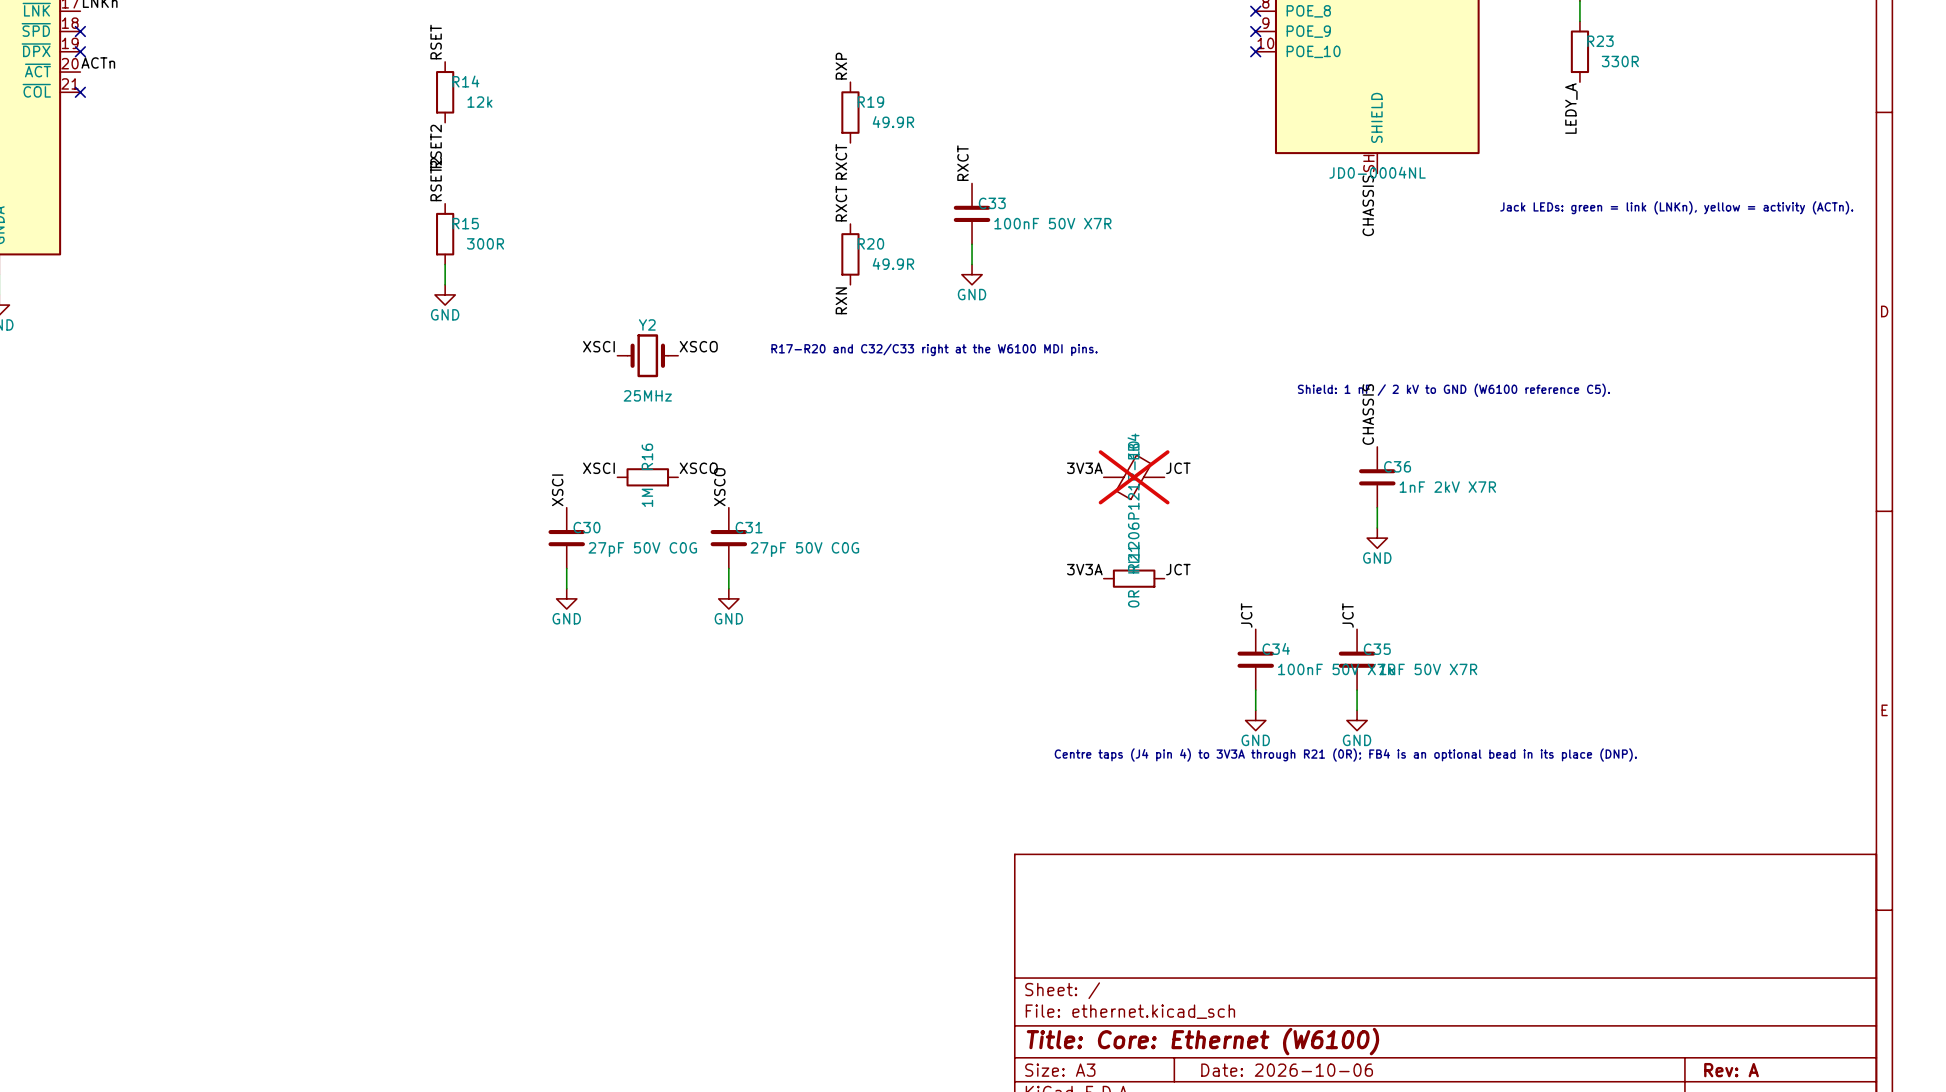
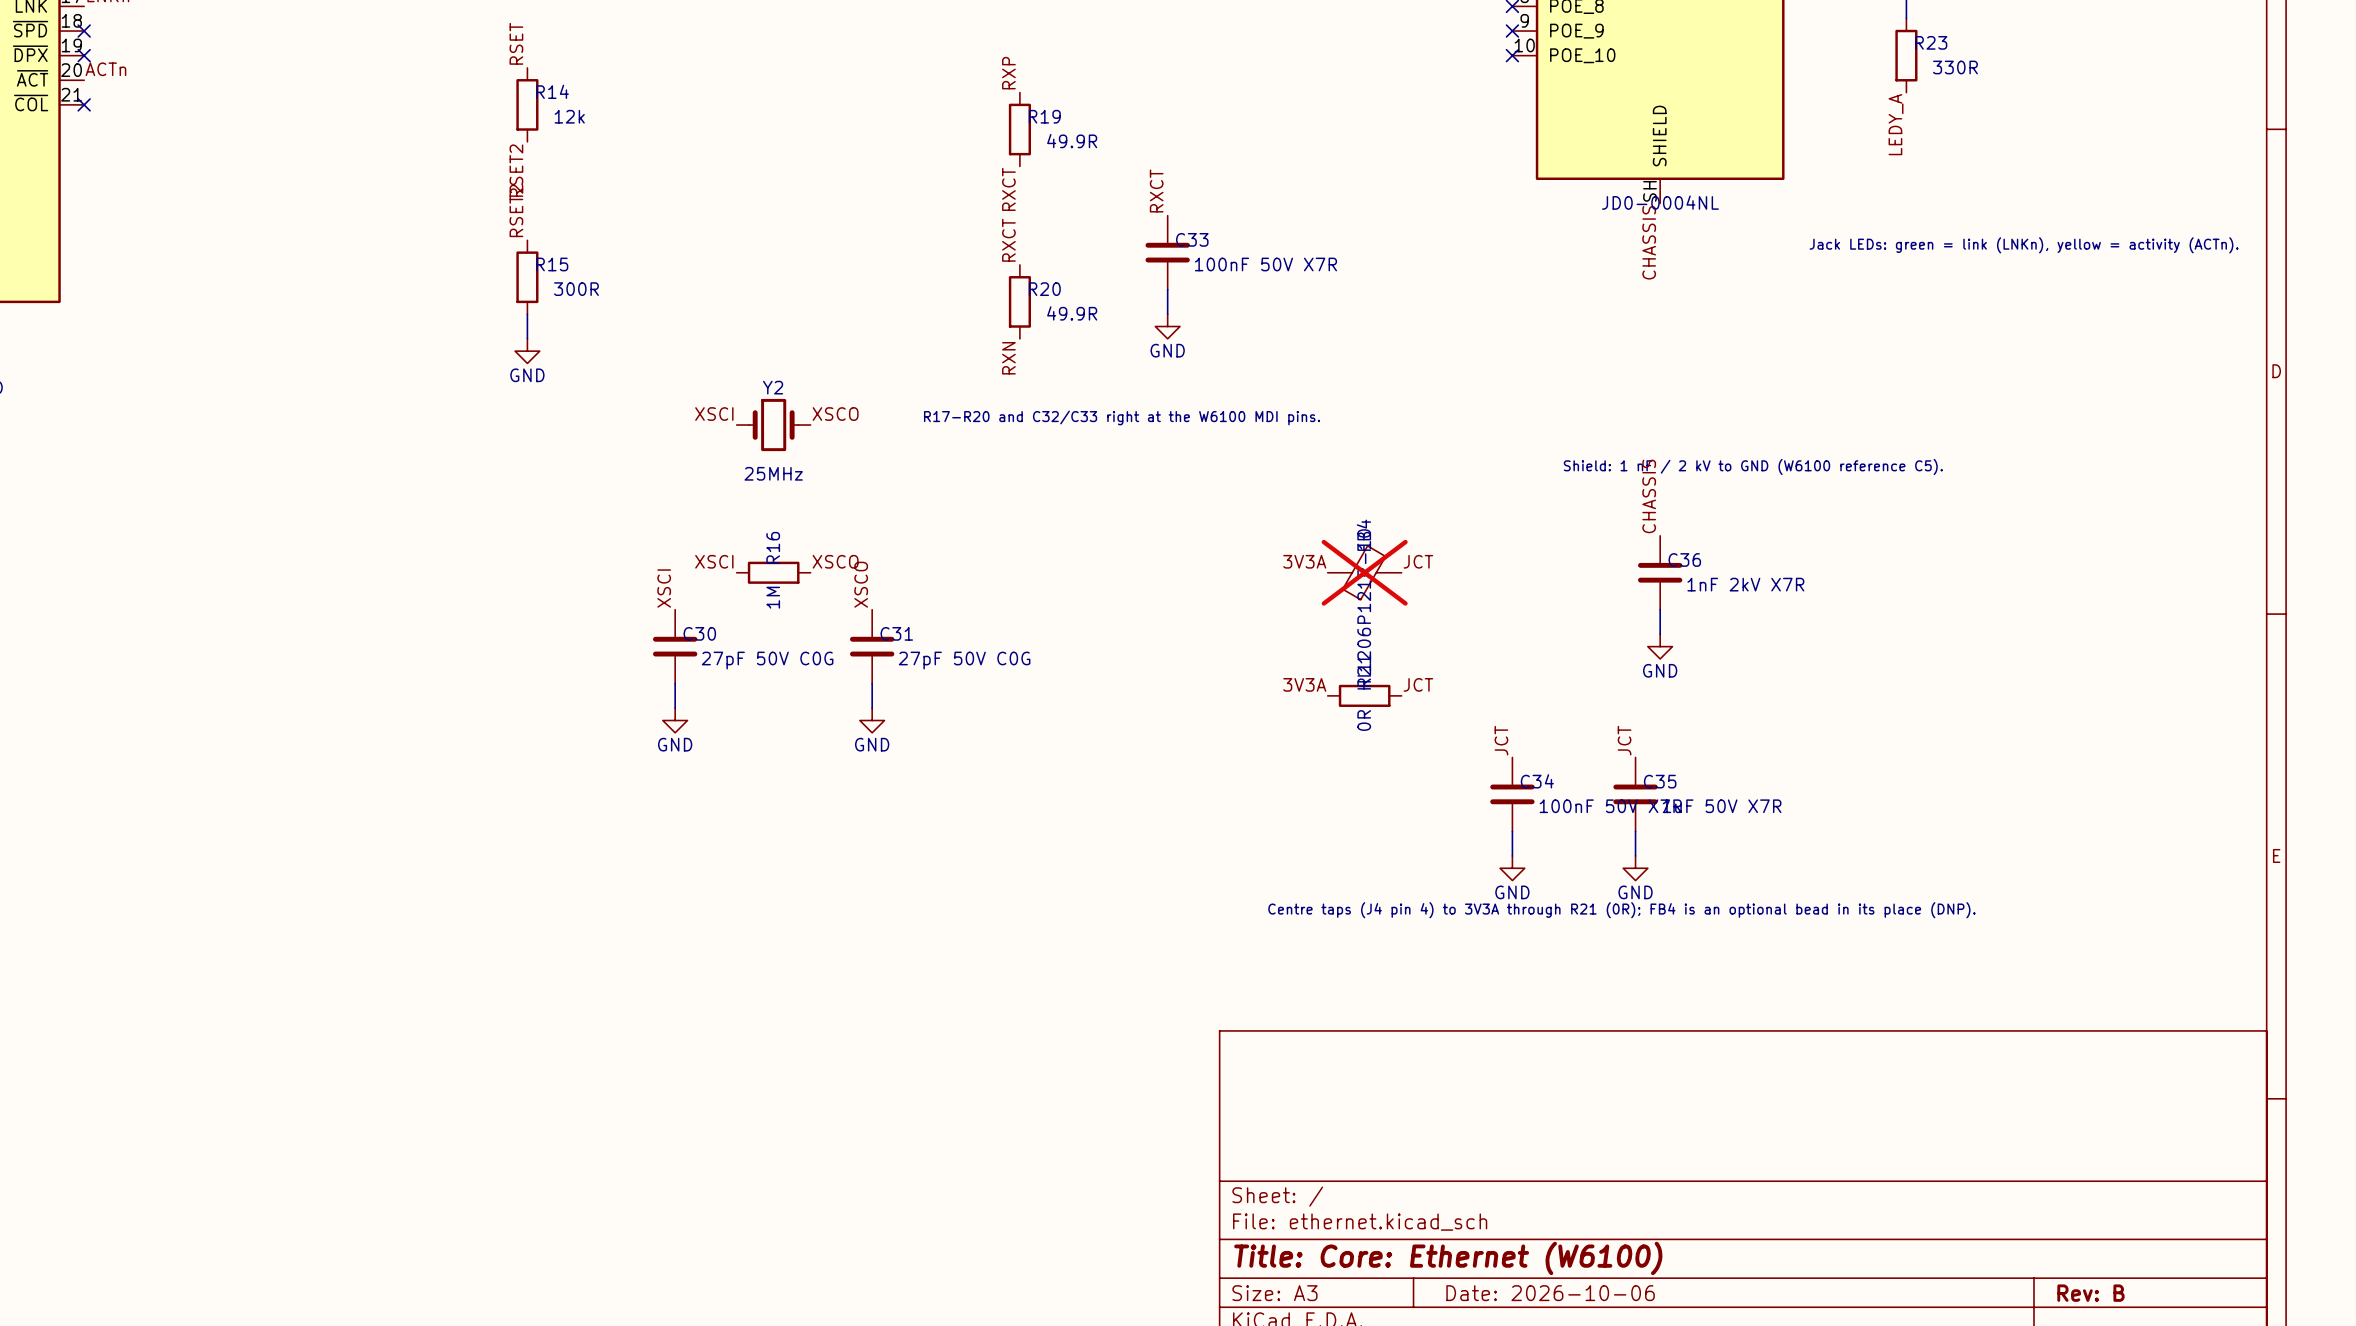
title block: Rev: A (1731, 1070) -> Rev: B (2090, 1293)

